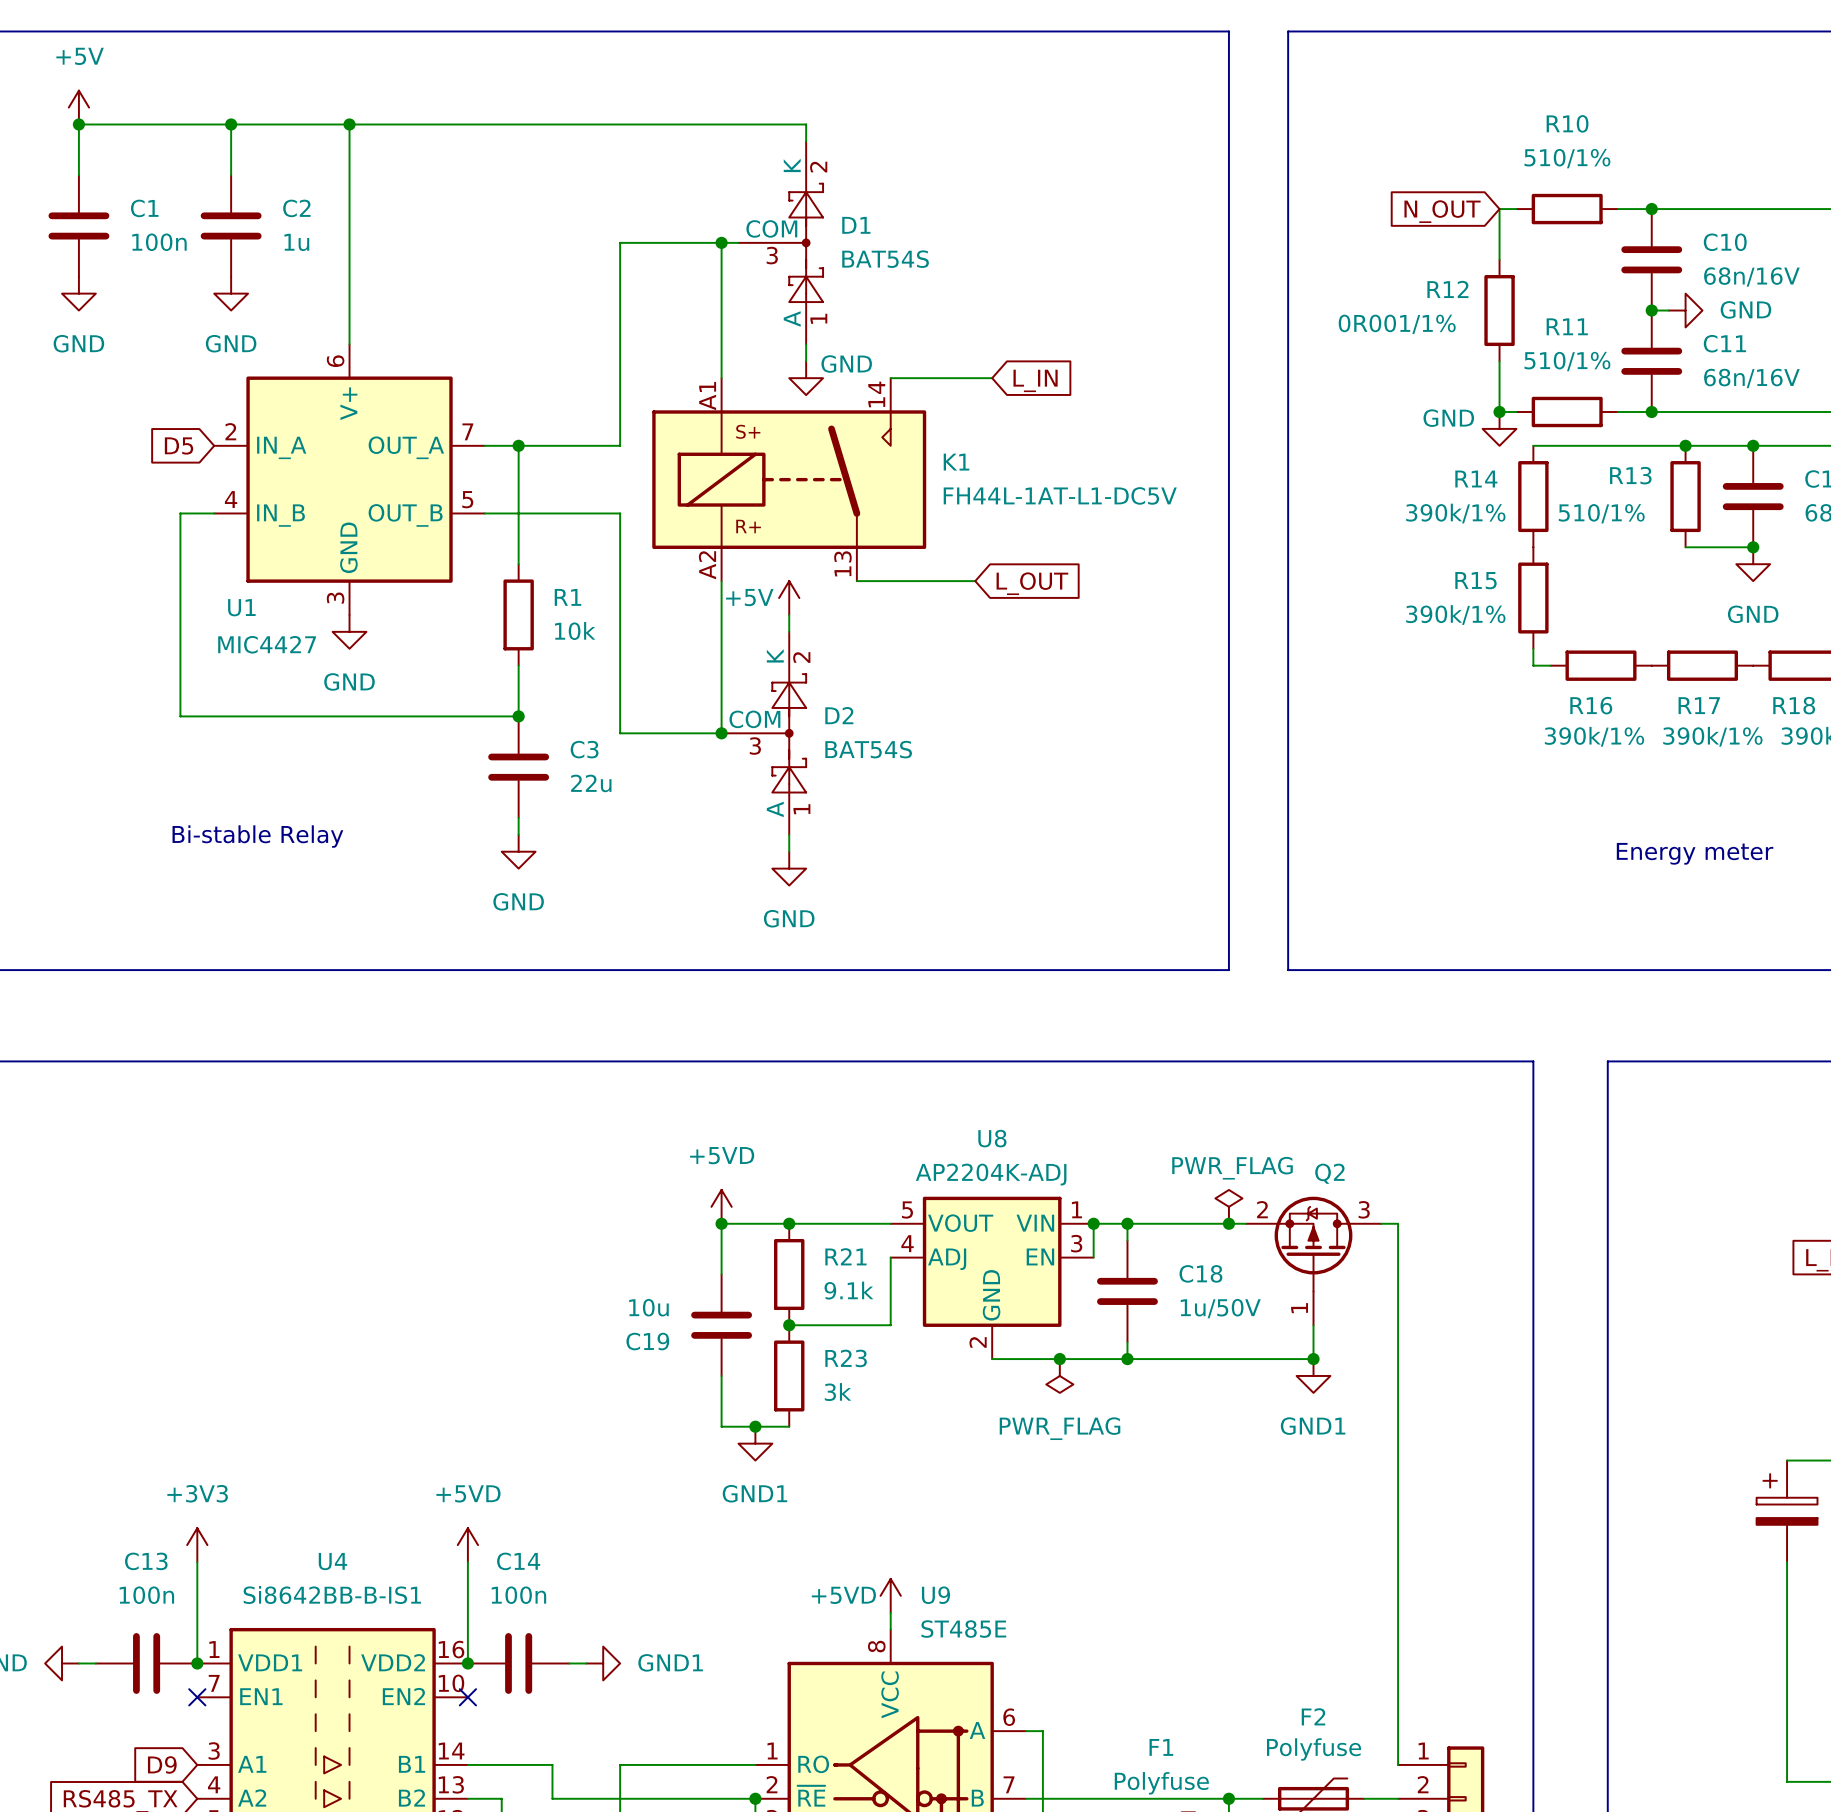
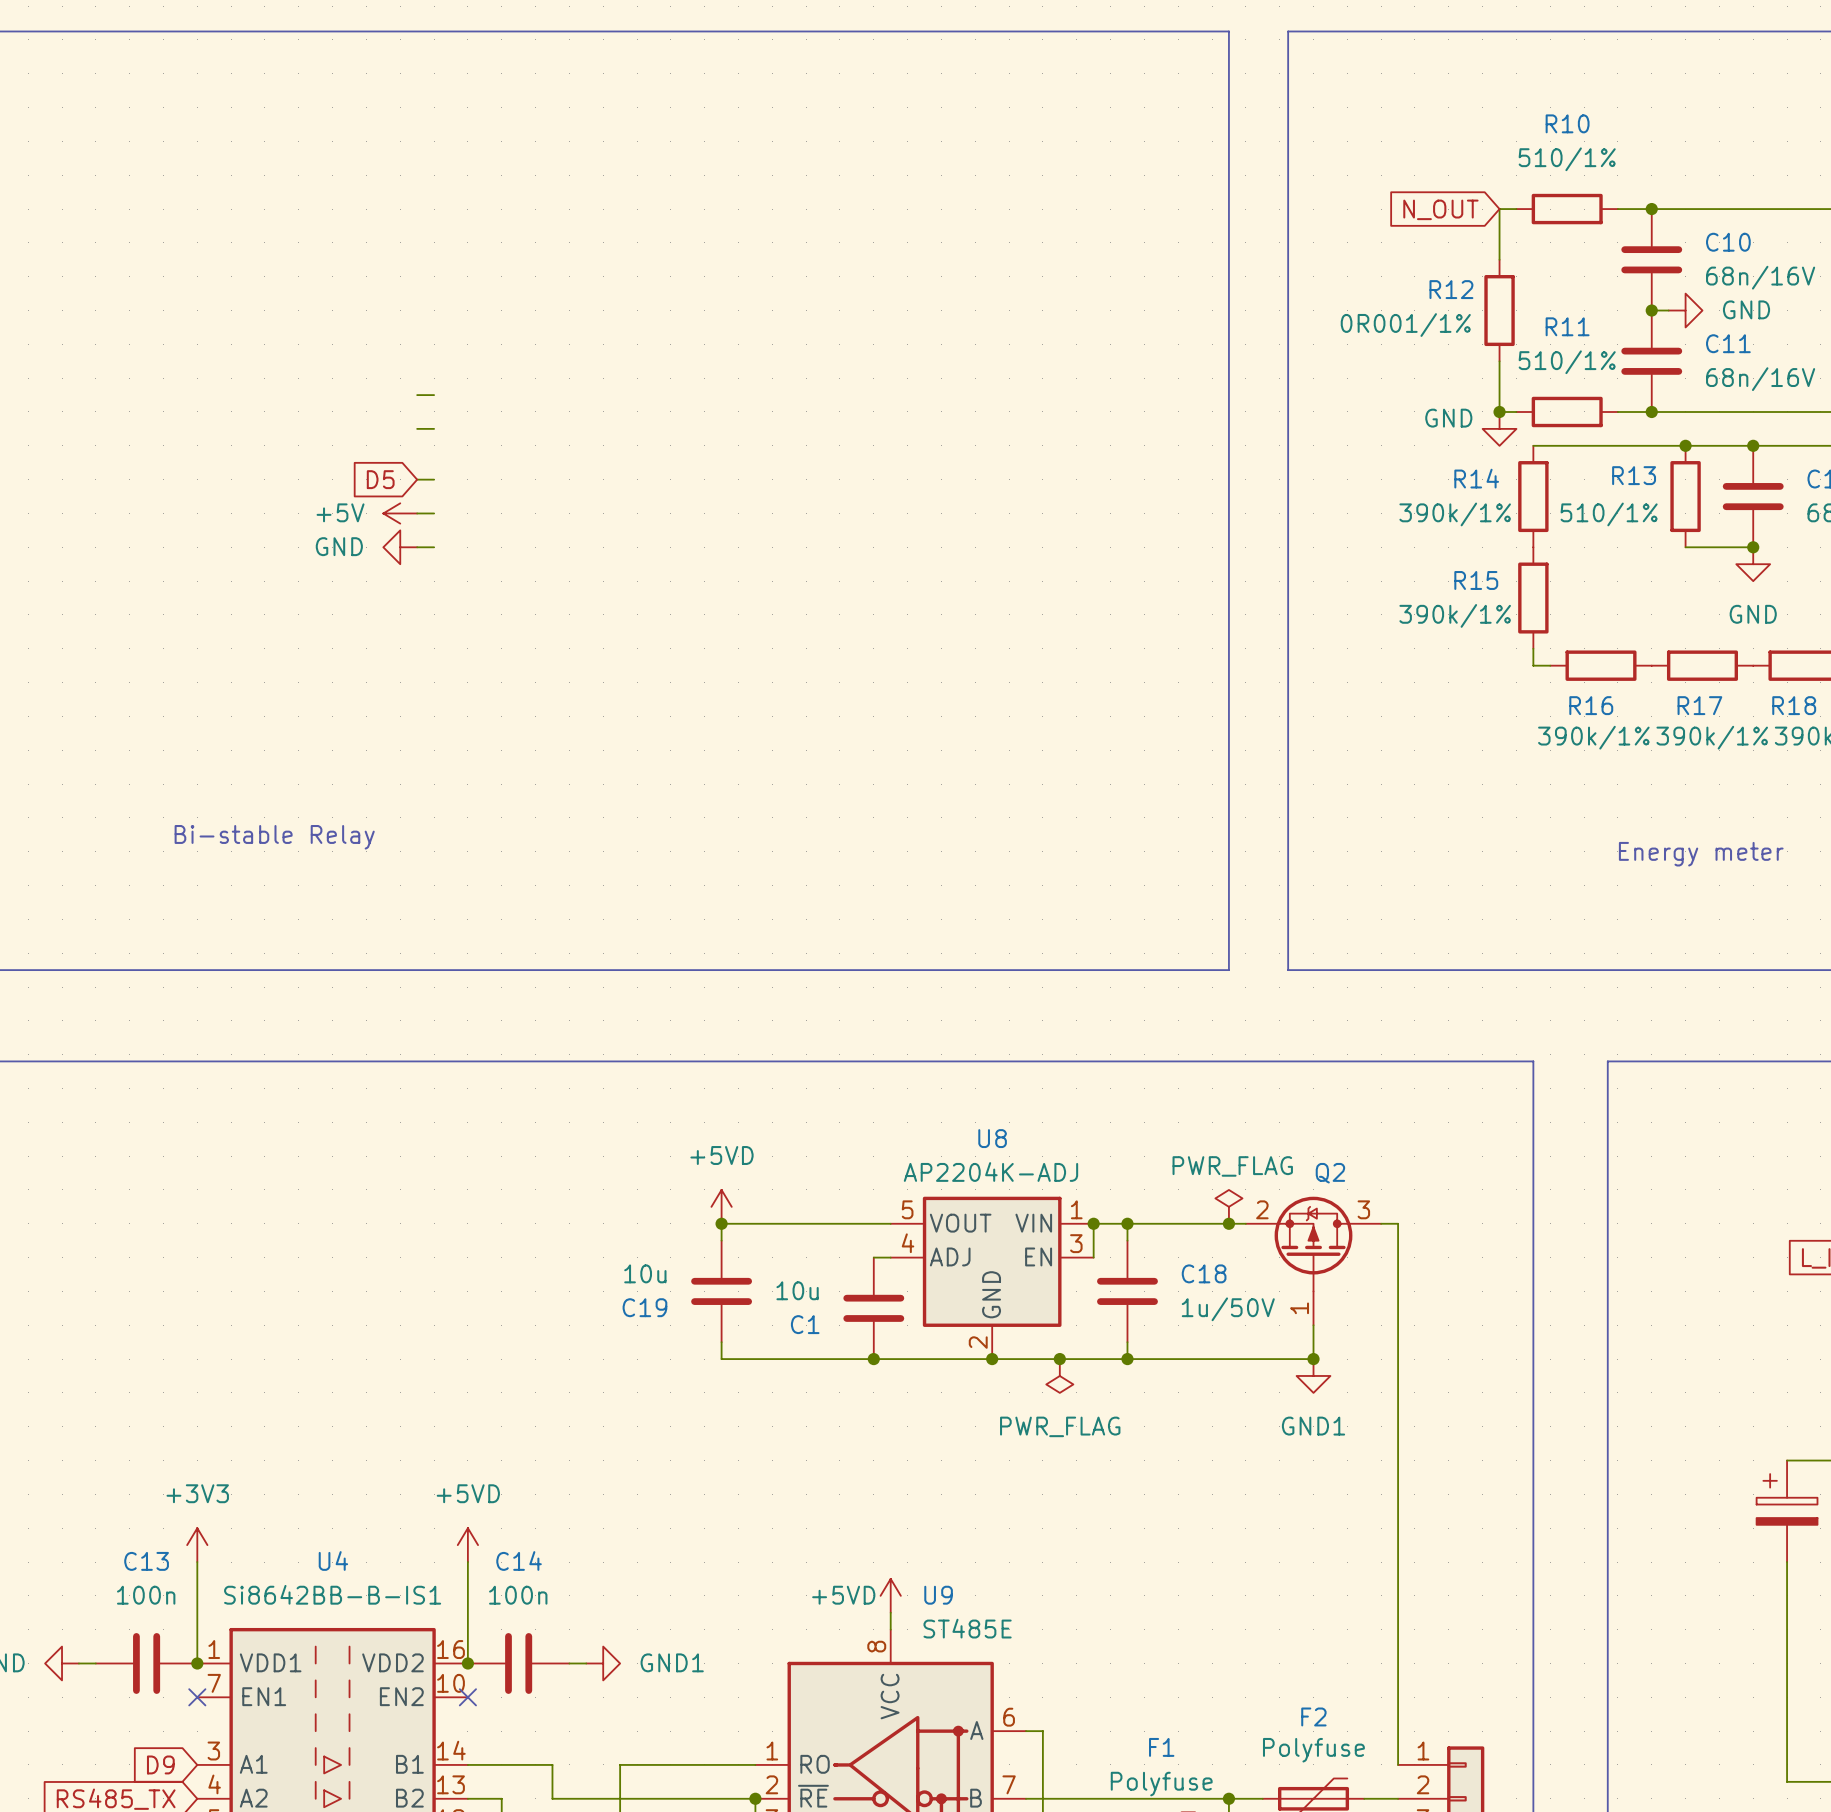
power symbol: +5V (78, 107) -> none
junction: (78, 124) -> none
wire: (231, 124) (231, 175) -> none
junction: (231, 124) -> none
wire: (349, 124) (349, 344) -> none
junction: (349, 124) -> none
wire: (806, 141) (806, 124) (78, 124) (78, 175) -> none
C1 name position: C1 (144, 208) -> C1 (805, 1324)
C1 position: (78, 225) -> (873, 1308)
C2: 1u (231, 225) -> none
C1 value: 100n (159, 242) -> 10u (797, 1290)
wire: (721, 242) (721, 378) -> none
junction: (721, 242) -> none
wire: (738, 242) (620, 242) (620, 445) (484, 445) -> none
D1: BAT54S (780, 242) -> none
power symbol: GND (78, 293) -> none
power symbol: GND (231, 293) -> none
wire: (806, 344) (806, 361) -> none
power symbol: GND (806, 378) -> none
wire: (890, 378) (992, 378) -> none
global label: L_IN (1035, 380) -> none
global label position: D5 (179, 445) -> D5 (380, 479)
wire: (518, 445) (518, 564) -> none
junction: (518, 445) -> none
U1: MIC4427 (349, 479) -> none
K1: FH44L-1AT-L1-DC5V (789, 479) -> none
wire: (214, 513) (180, 513) (180, 716) (518, 716) (518, 665) -> none
power symbol: none -> +5V (400, 513)
wire: (484, 513) (620, 513) (620, 733) (721, 733) (721, 581) -> none
wire: (856, 581) (975, 581) -> none
global label: L_OUT (1032, 583) -> none
power symbol: +5V (789, 598) -> none
R1: 10k (518, 614) -> none
wire: (789, 614) (789, 631) -> none
power symbol rotation: 0° (349, 631) -> 90° clockwise (400, 547)
power symbol position: GND (349, 631) -> GND (400, 547)
junction: (518, 716) -> none
junction: (721, 733) -> none
D2: BAT54S (763, 733) -> none
C3: 22u (518, 767) -> none
wire: (518, 817) (518, 834) -> none
wire: (789, 834) (789, 851) -> none
power symbol: GND (518, 851) -> none
power symbol: GND (789, 868) -> none
junction: (789, 1223) -> none
wire: (890, 1257) (890, 1325) (789, 1325) -> (890, 1257) (873, 1257)
R21: 9.1k (789, 1274) -> none
C19 position: (721, 1325) -> (721, 1291)
junction: (789, 1325) -> none
wire: none -> (721, 1342) (721, 1359) (992, 1359)
junction: none -> (873, 1359)
junction: none -> (992, 1359)
wire: (721, 1375) (721, 1426) (789, 1426) -> none
R23: 3k (789, 1375) -> none
junction: (755, 1426) -> none
power symbol: GND1 (755, 1443) -> none

